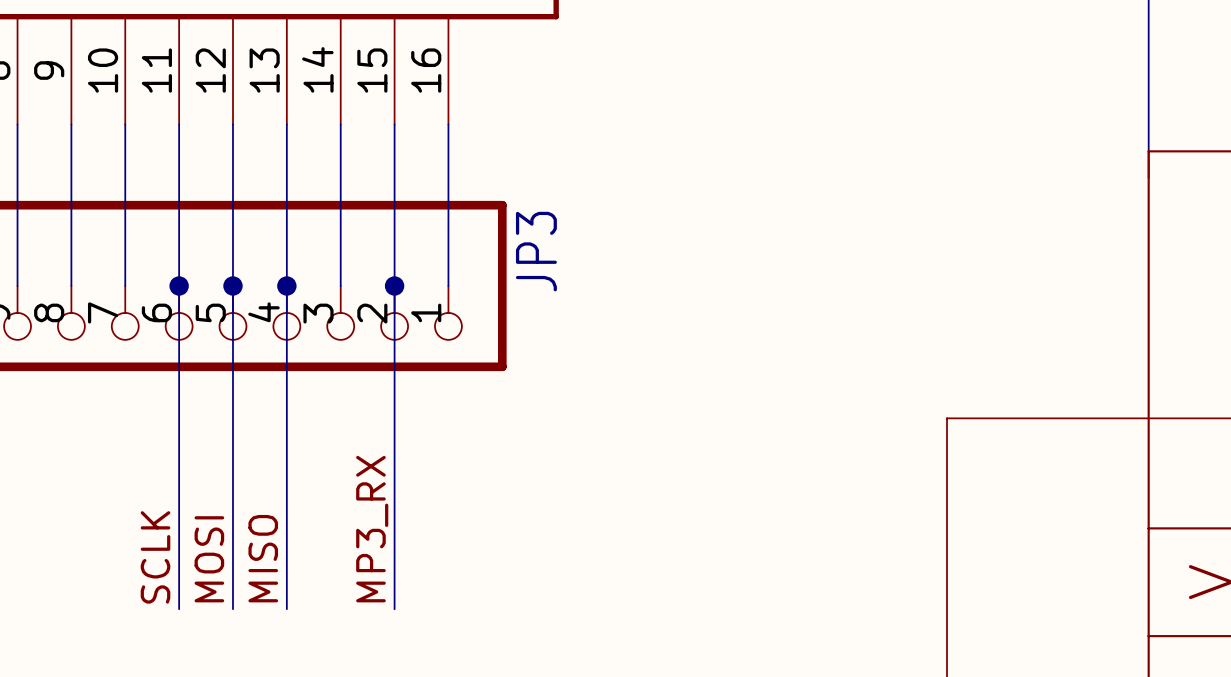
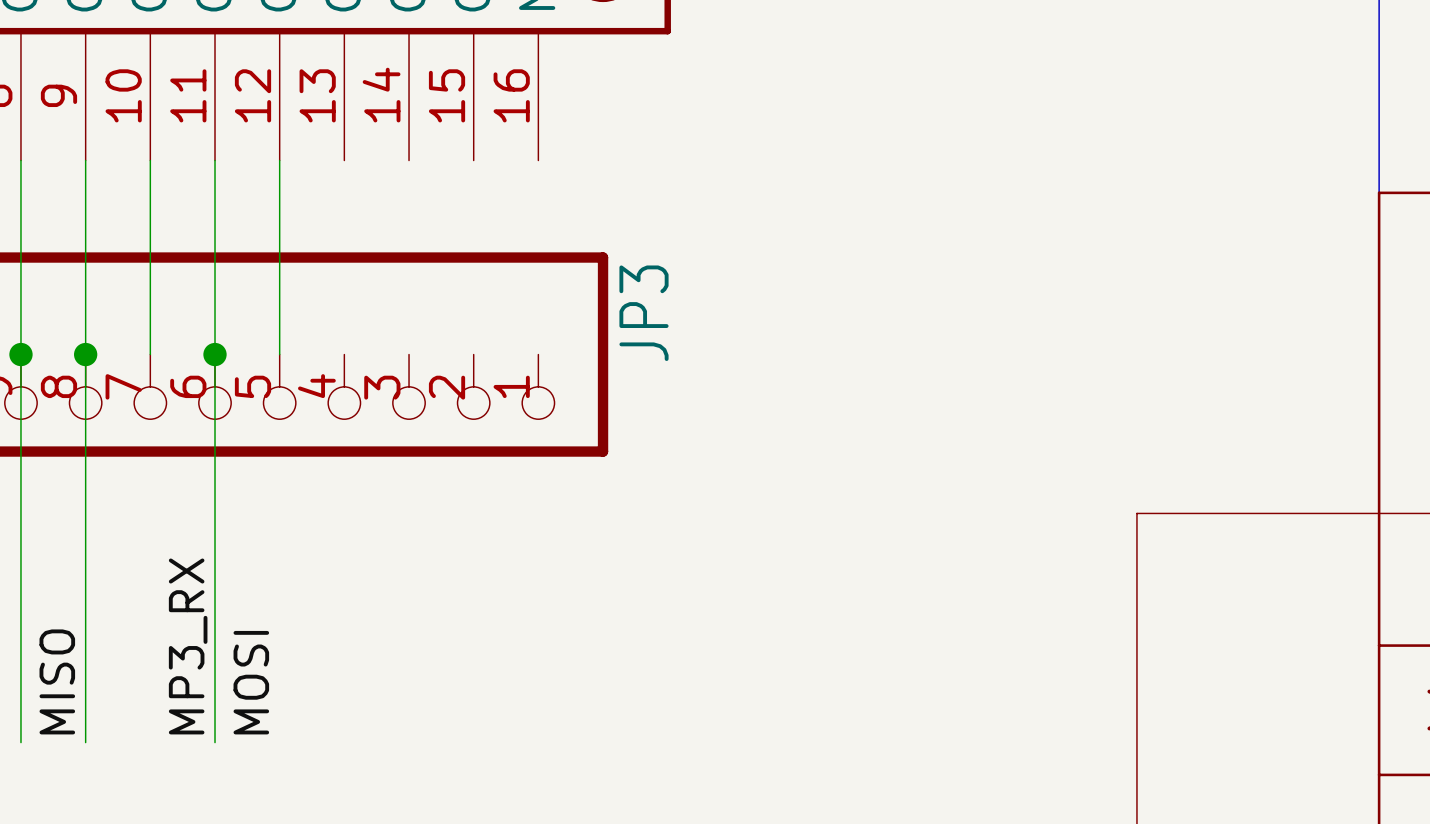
wire: (286, 124) (286, 609) -> none
wire: (340, 124) (340, 286) -> none
wire: (394, 124) (394, 609) -> none
wire: (448, 124) (448, 286) -> none
wire: none -> (20, 354) (20, 742)
junction: none -> (20, 354)
junction: none -> (85, 354)
wire: (232, 286) (232, 609) -> (85, 354) (85, 742)
junction: (232, 286) -> none
junction: (286, 286) -> none
junction: (394, 286) -> none
label: MP3_RX (372, 529) -> none
label: SCLK (155, 557) -> MP3_RX (188, 646)
label position: MISO (263, 558) -> MISO (57, 681)

